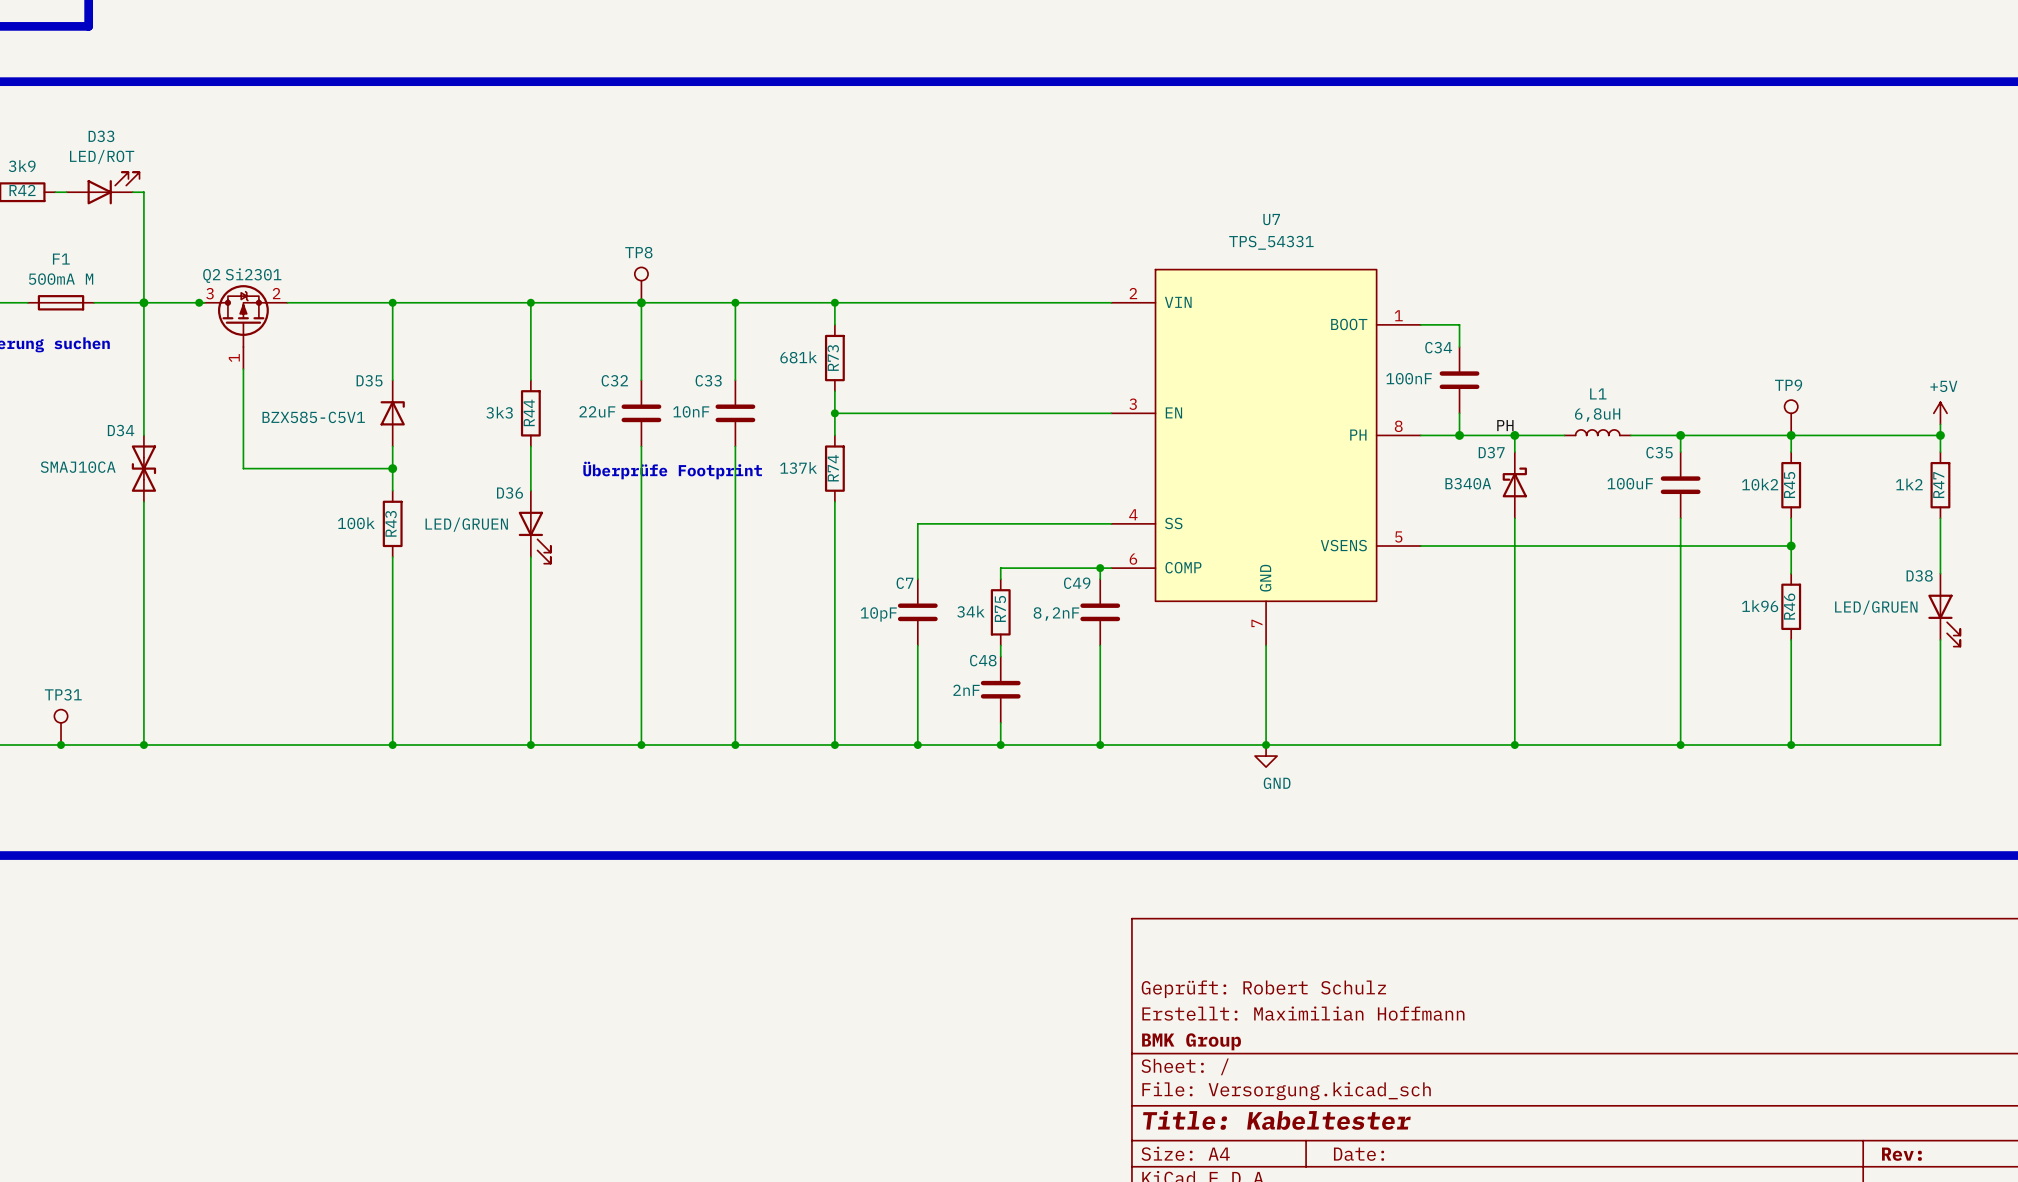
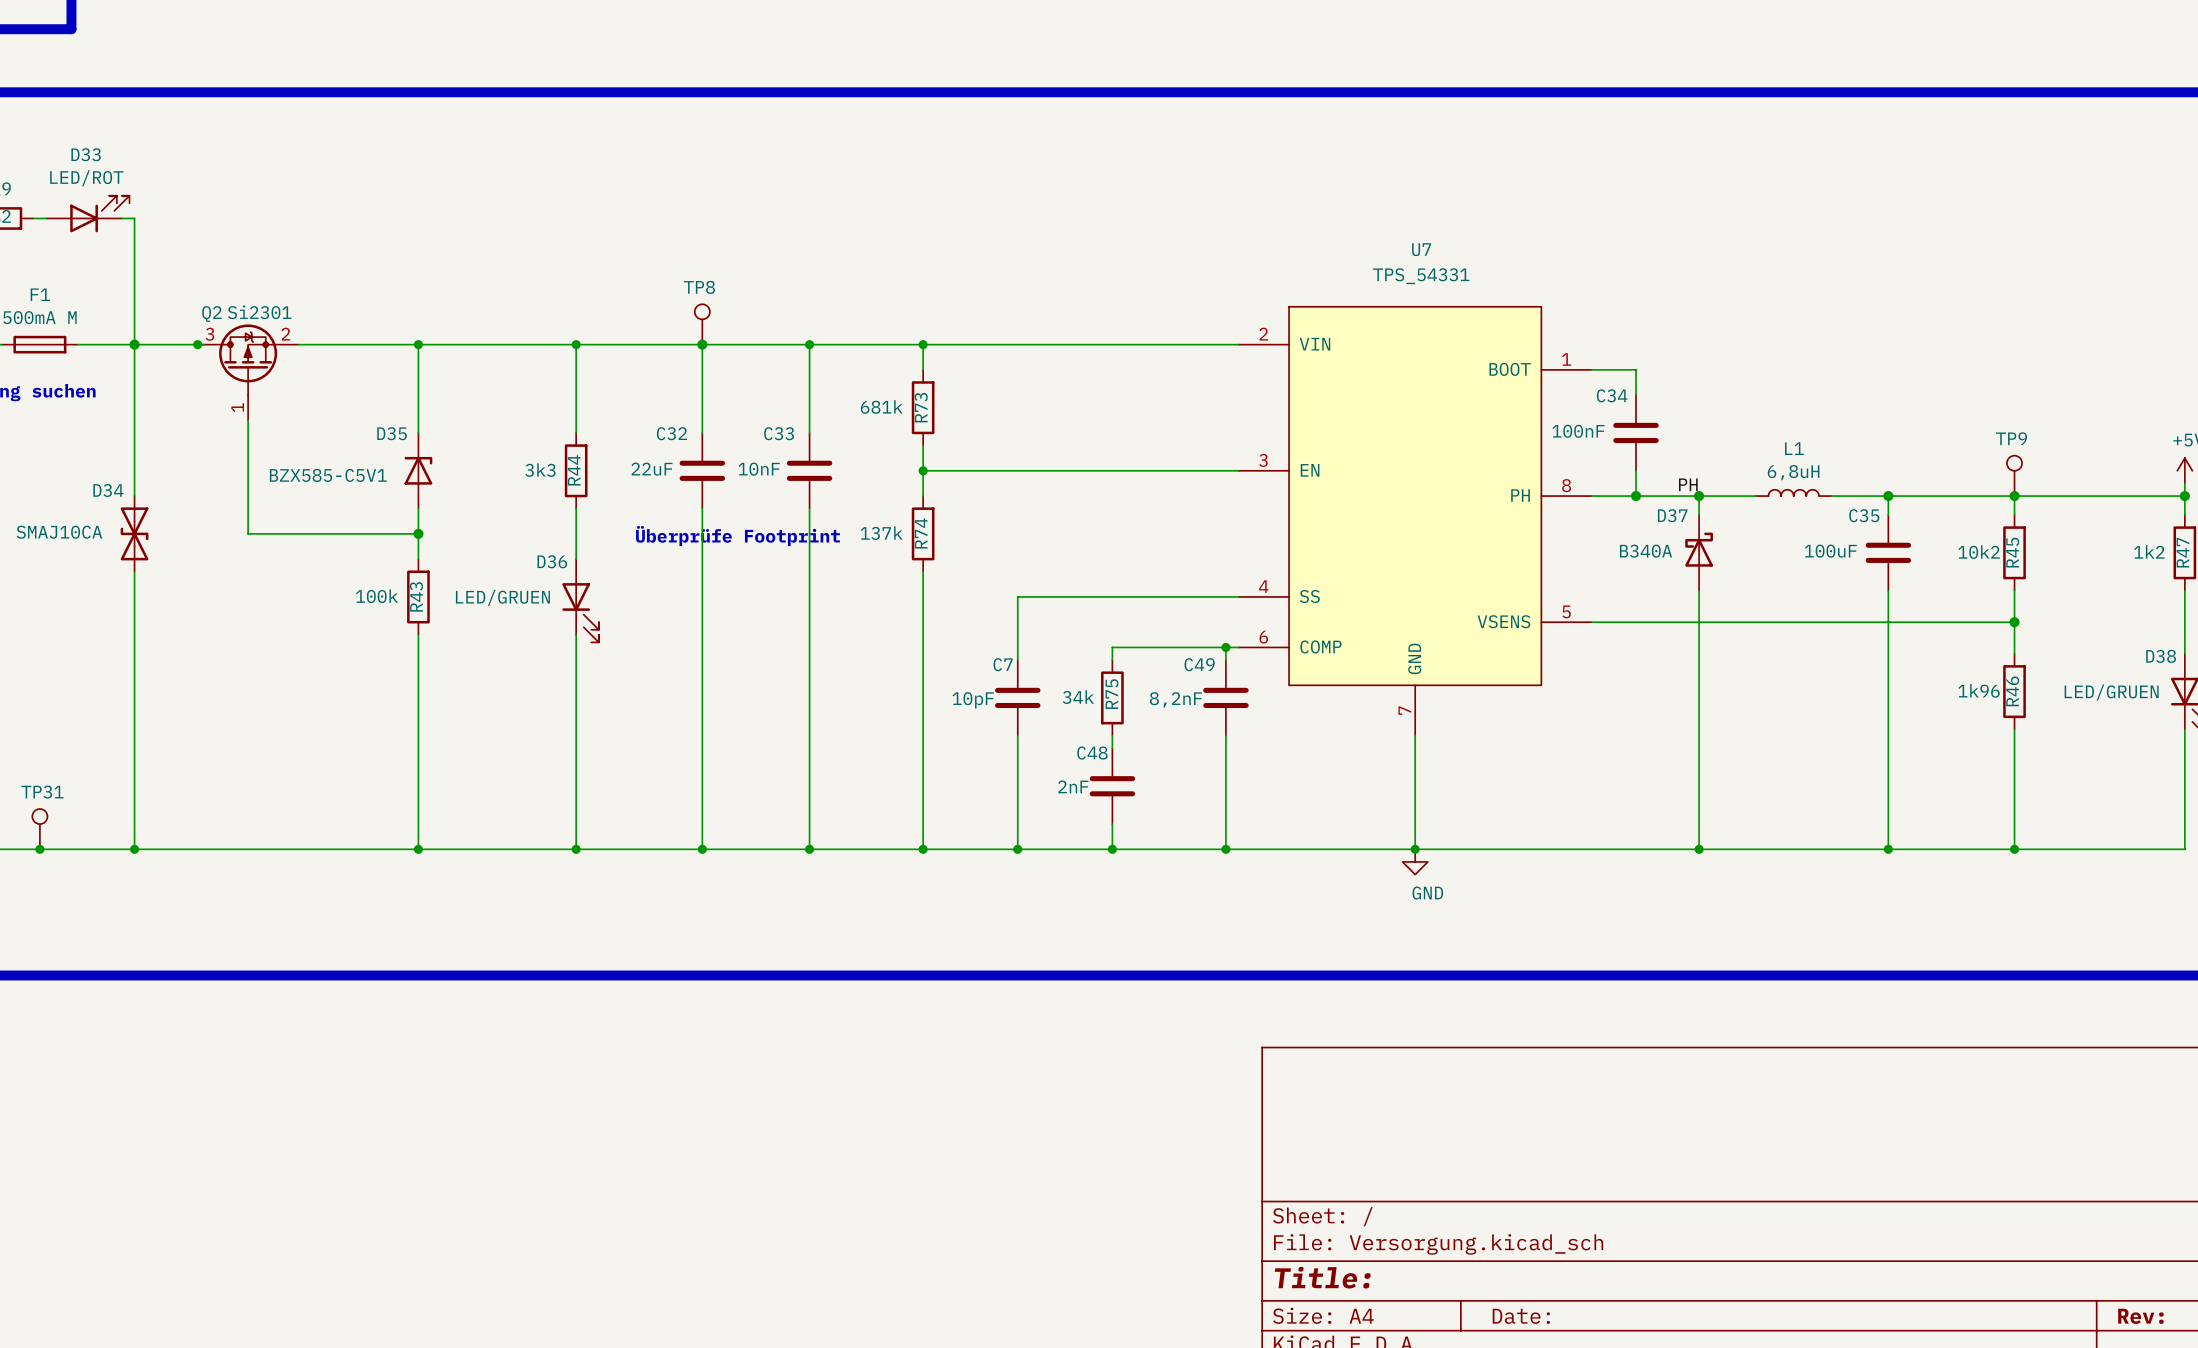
title block: Geprüft: Robert Schulz (1263, 989) -> none
title block: Erstellt: Maximilian Hoffmann (1303, 1013) -> none
title block: BMK Group (1191, 1041) -> none
title block: Title: Kabeltester (1276, 1120) -> Title: (1322, 1277)

